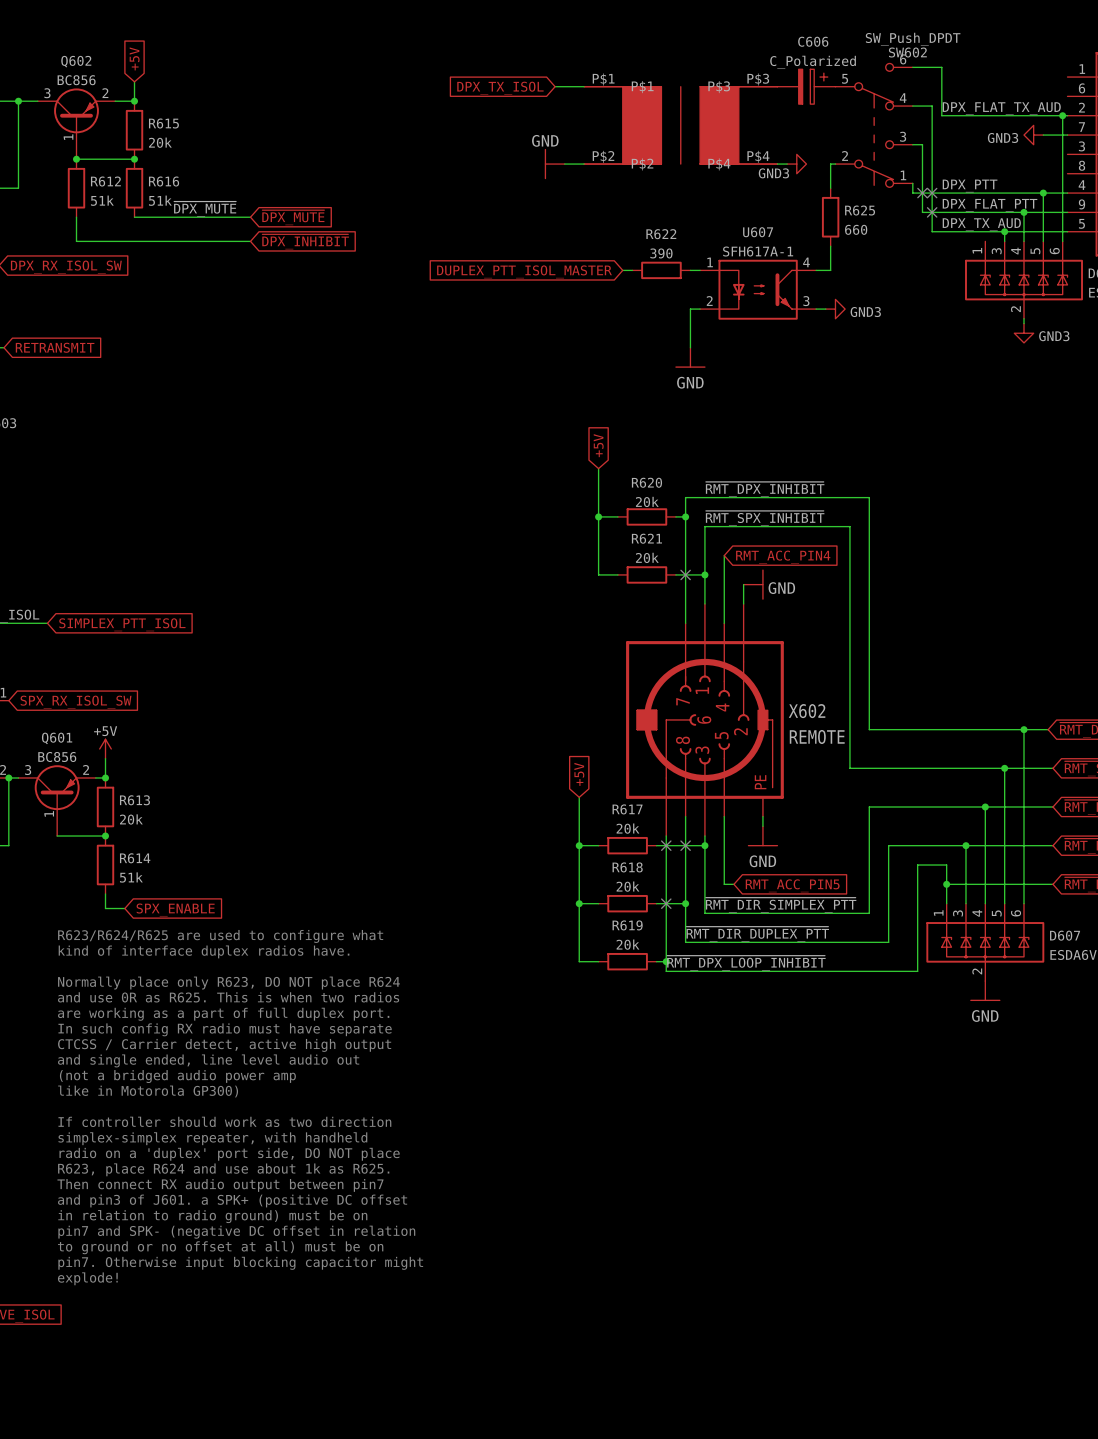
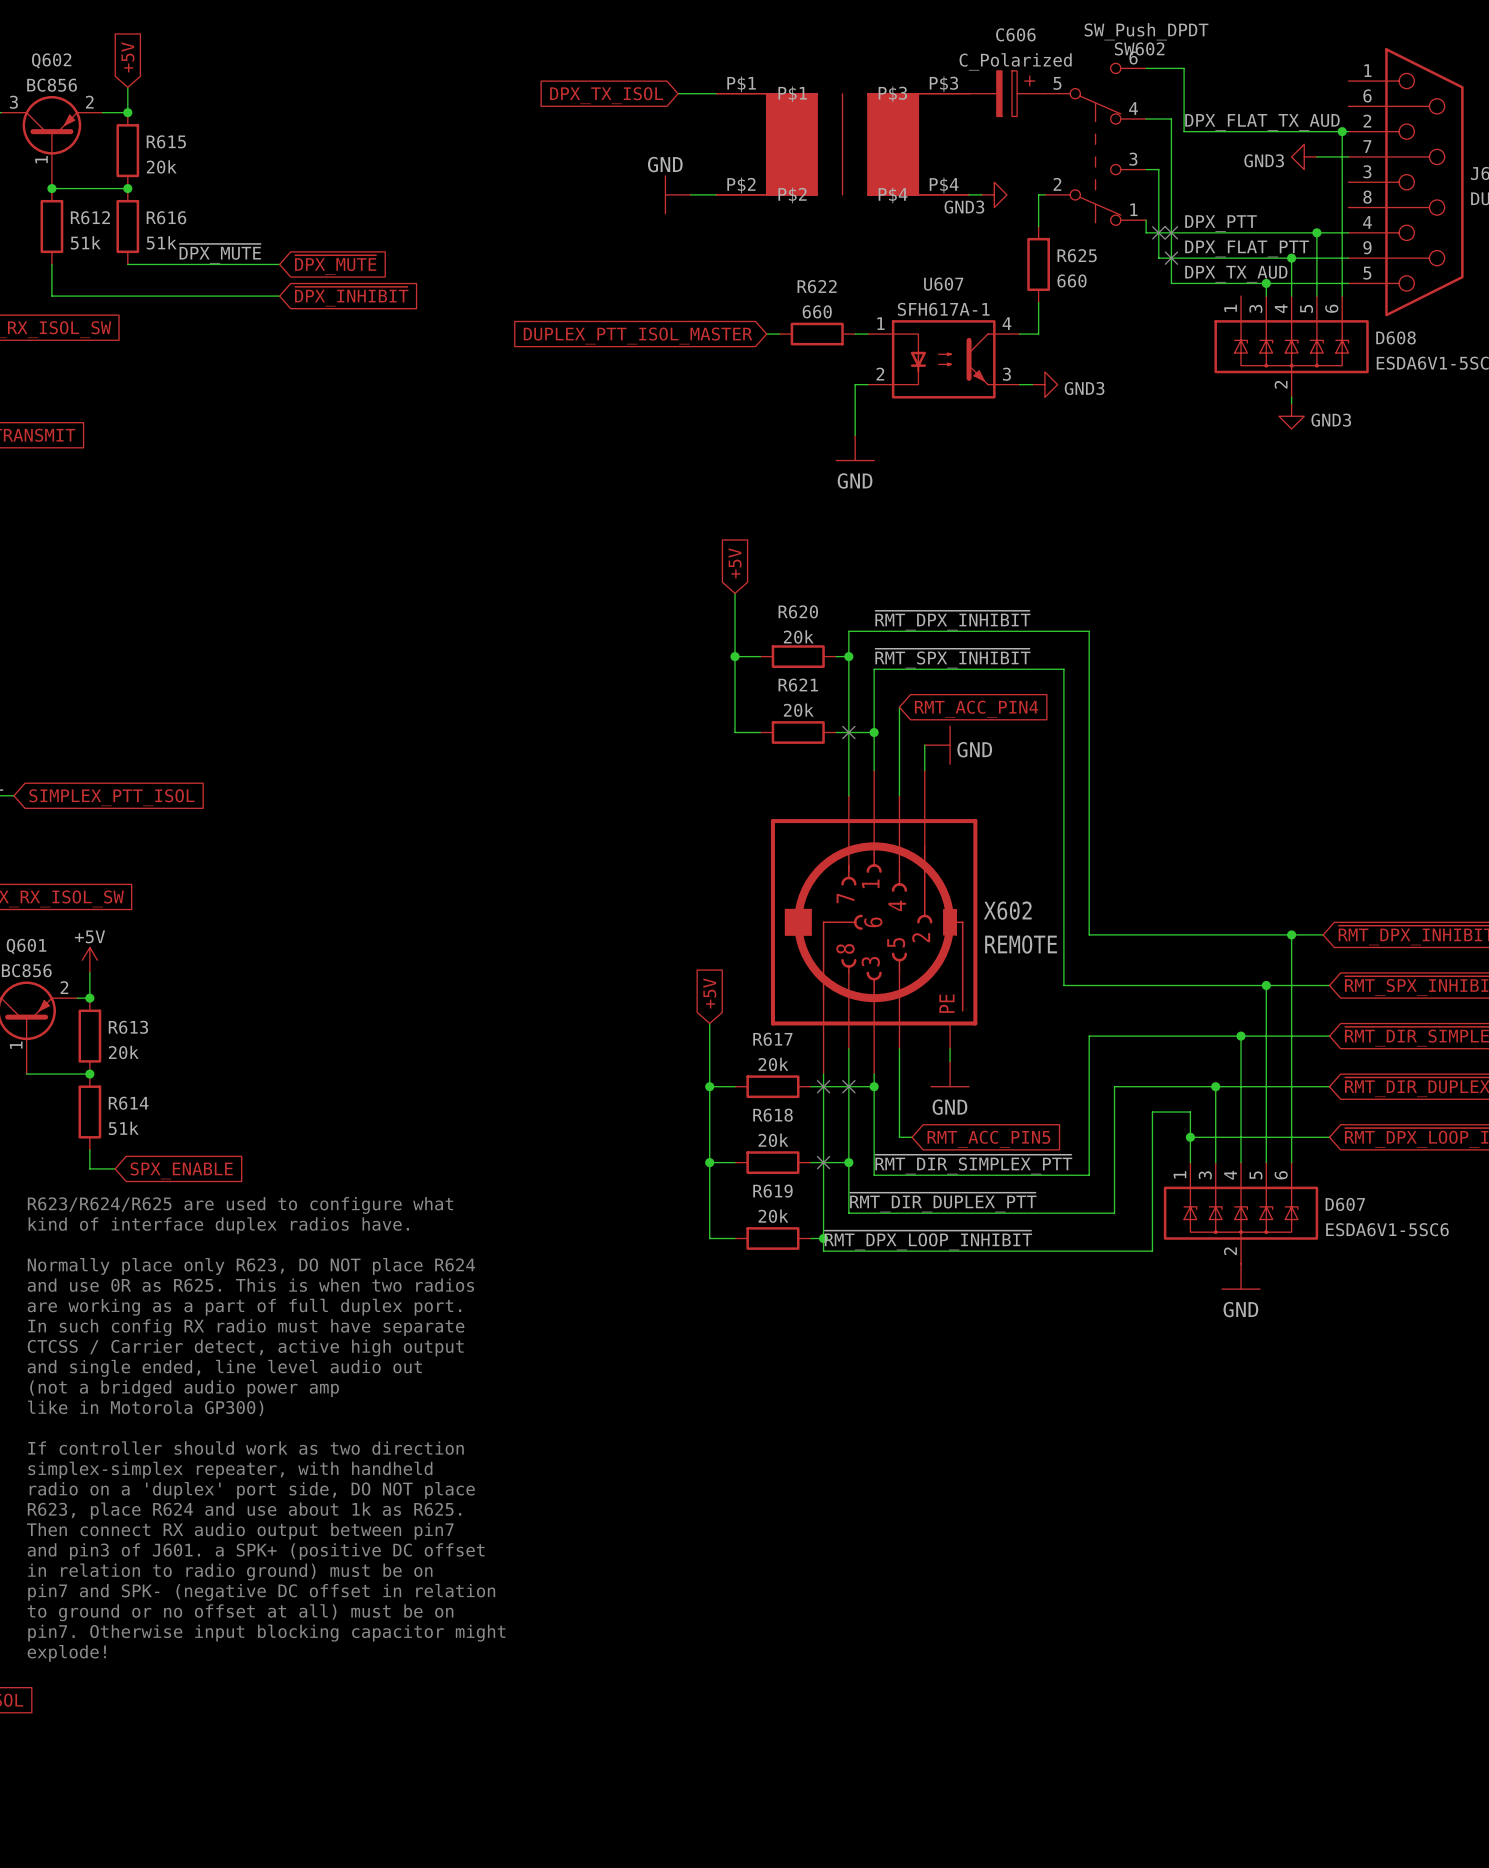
R622 value: 390 (661, 253) -> 660 (817, 311)

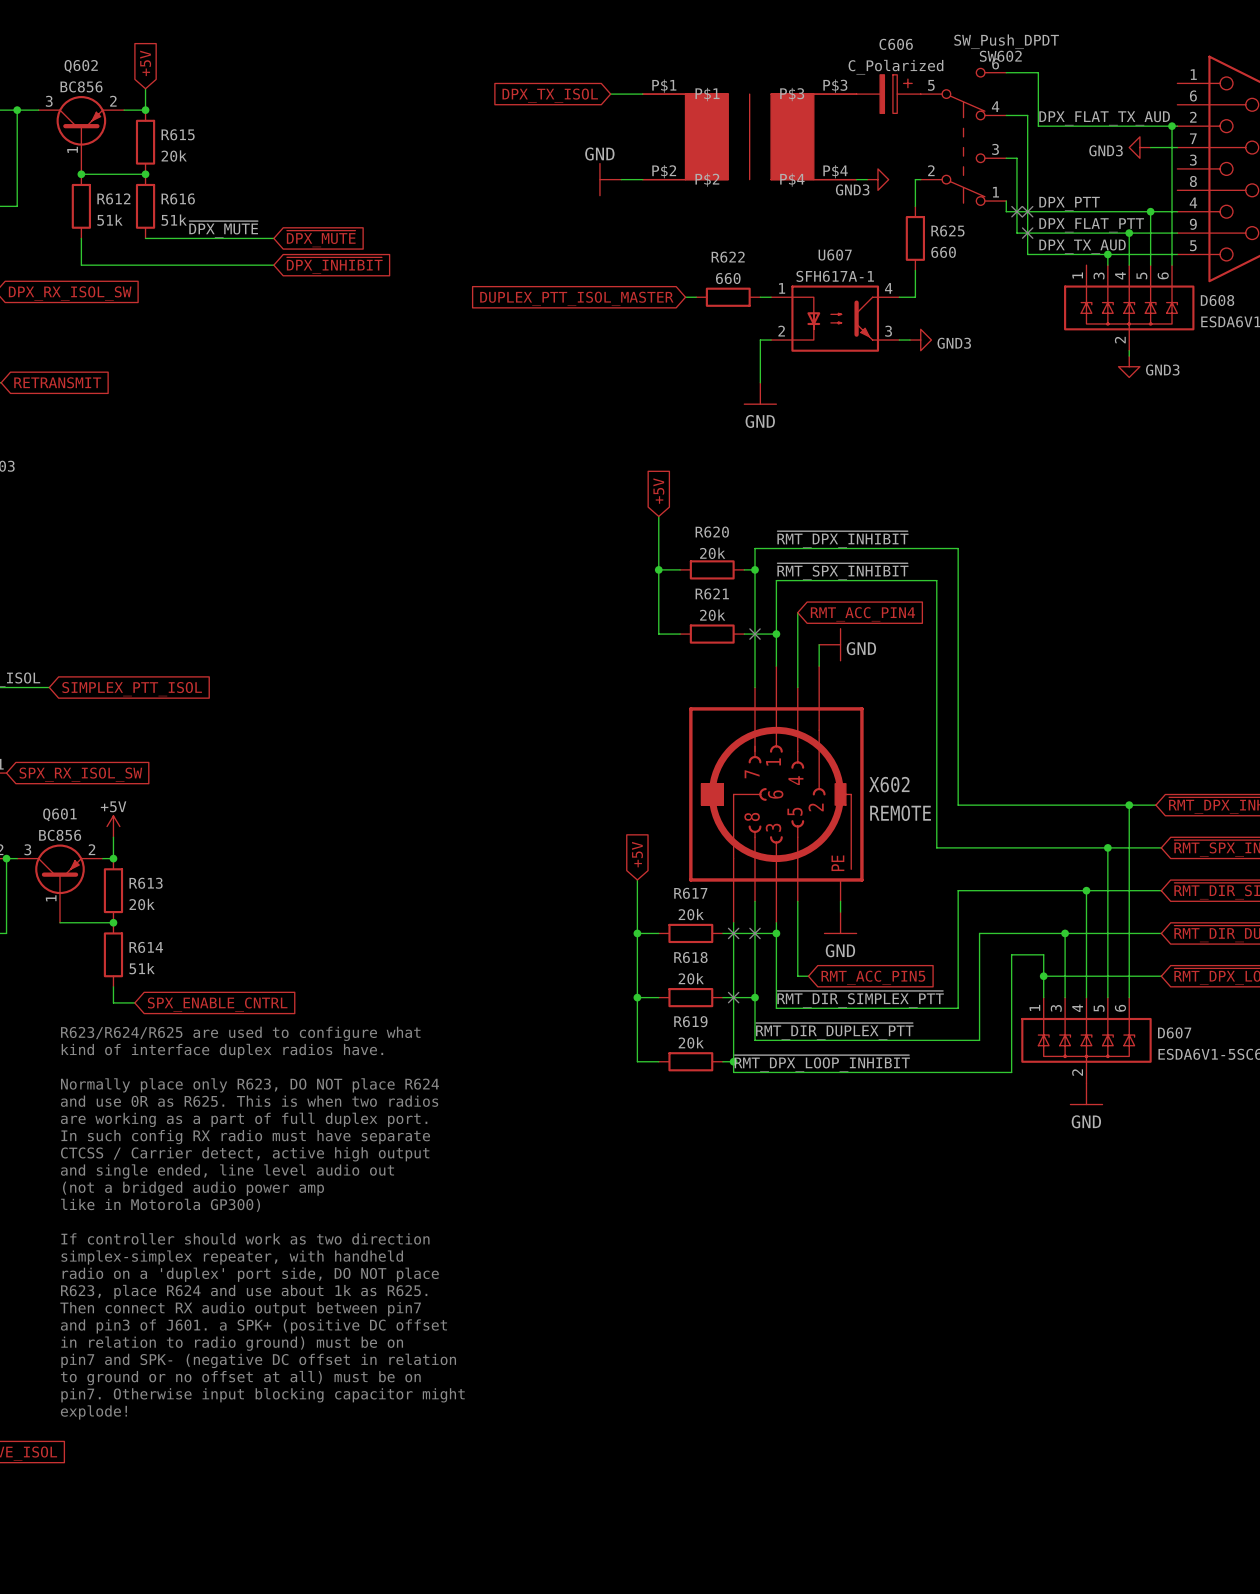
global label: SPX_ENABLE (181, 1170) -> SPX_ENABLE_CNTRL (217, 1004)

